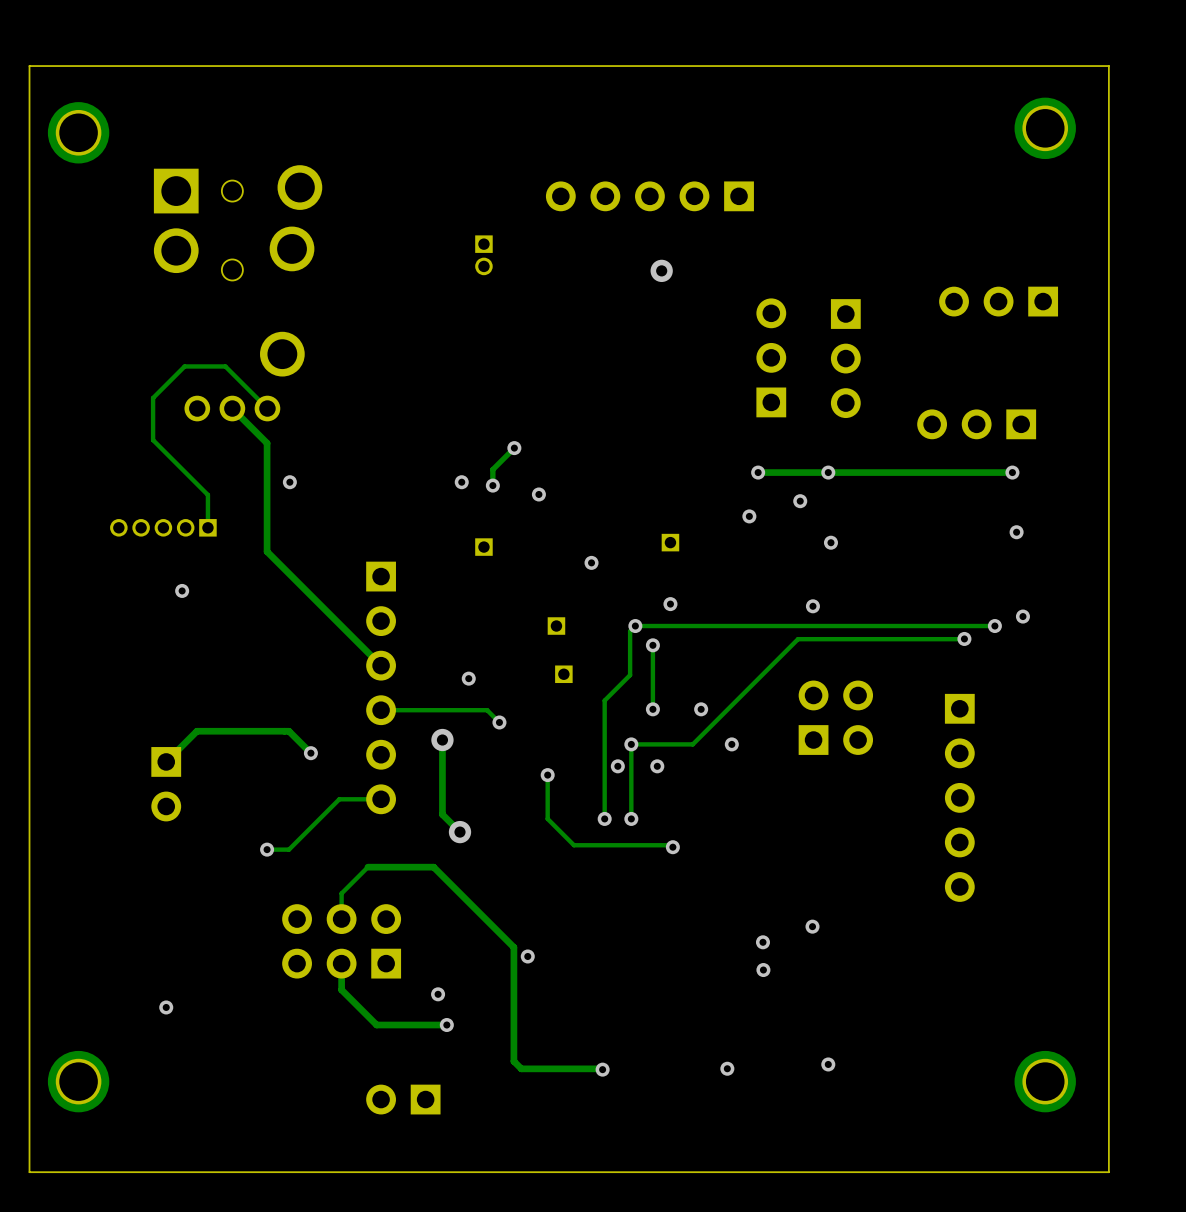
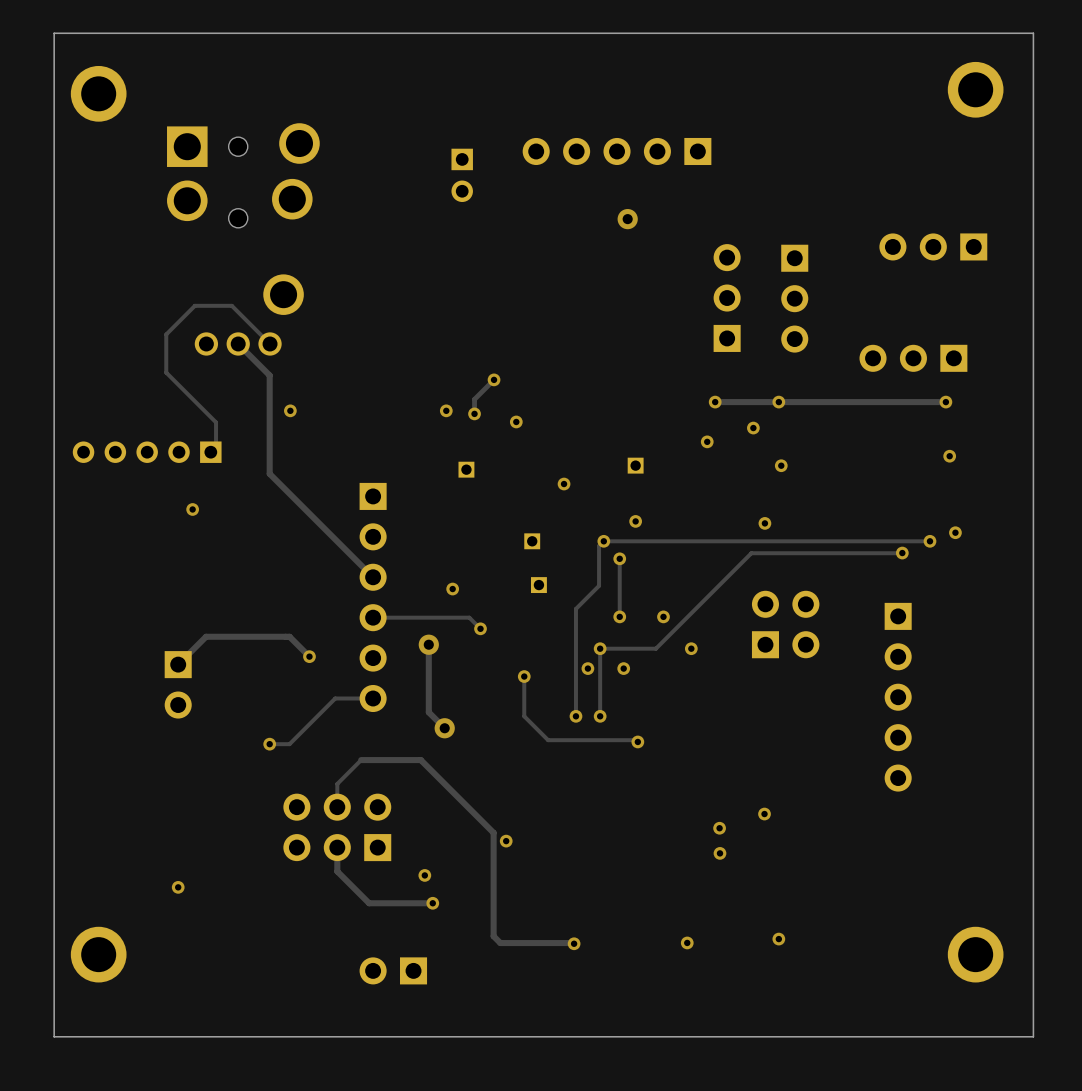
part: none -> (462, 175)
part: (483, 255) -> none
part: none -> (147, 452)
part: (163, 527) -> none

